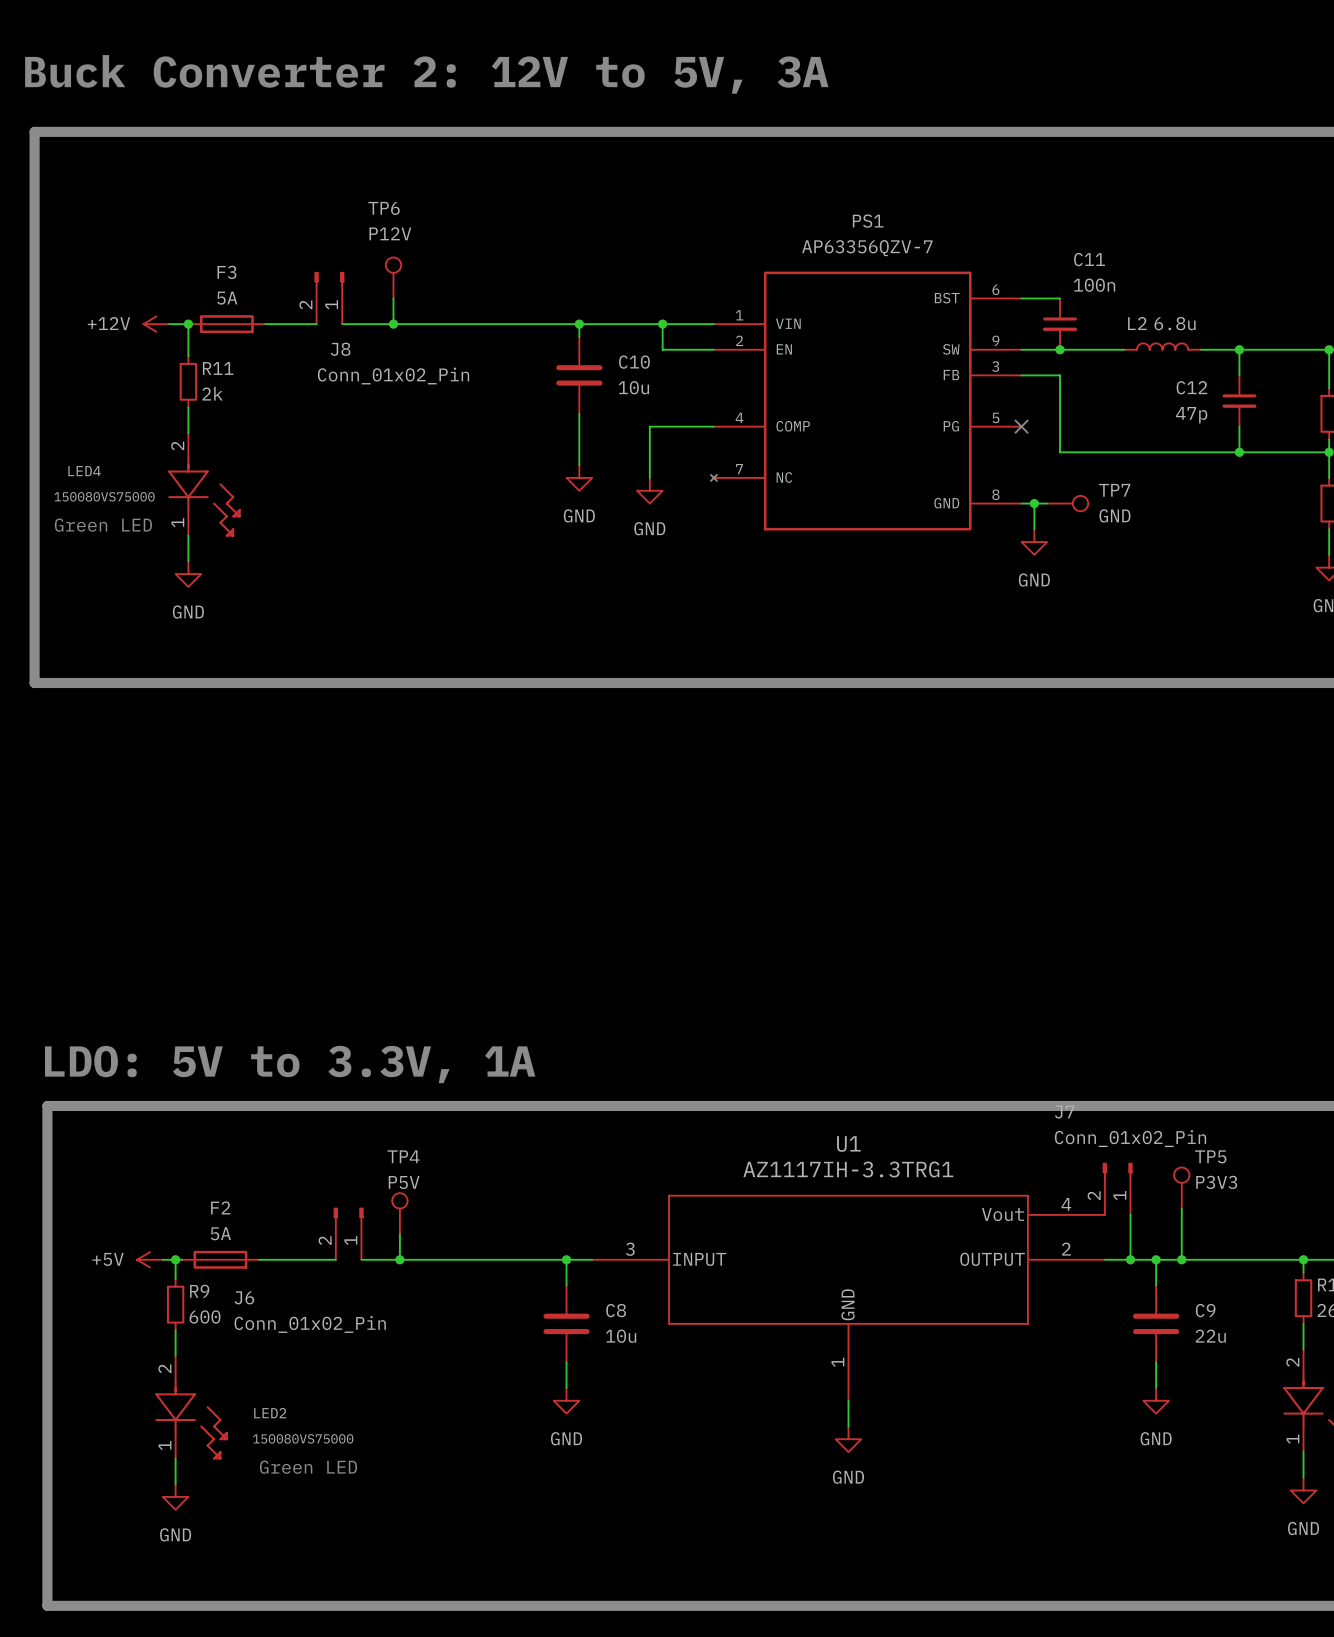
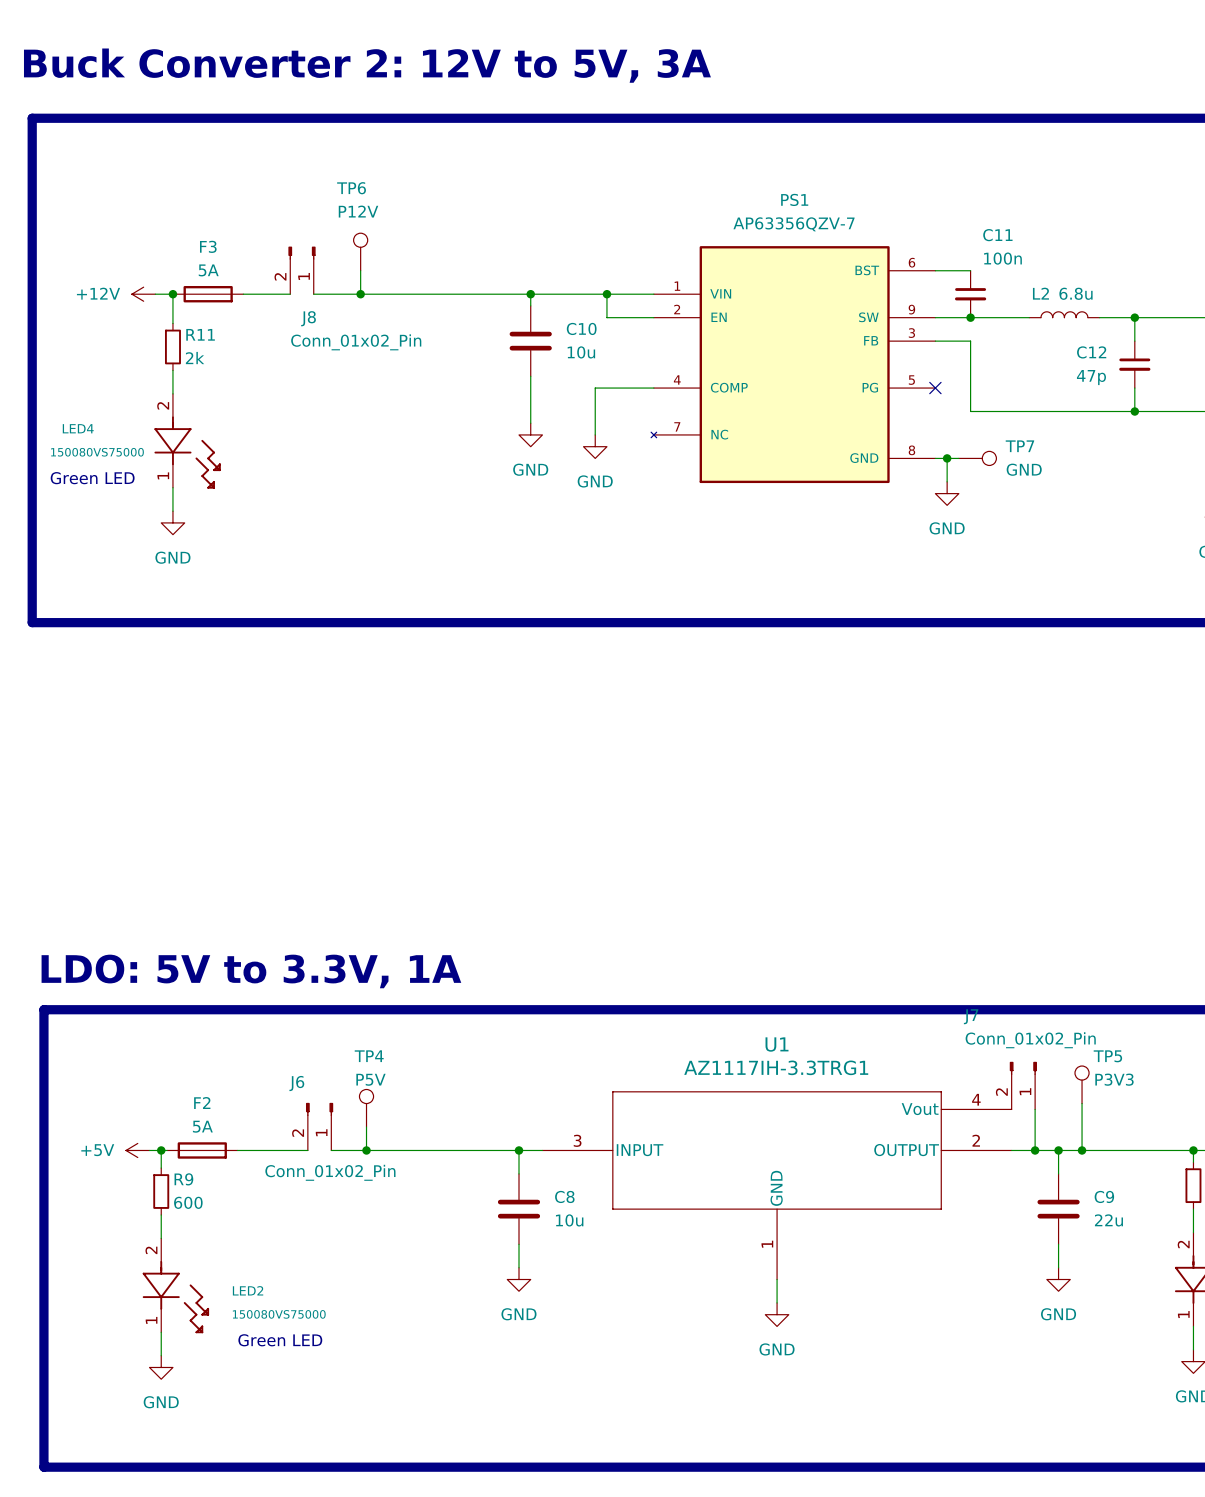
J6 name position: J6 (244, 1297) -> J6 (296, 1083)
J6 value position: Conn_01x02_Pin (310, 1324) -> Conn_01x02_Pin (330, 1172)

